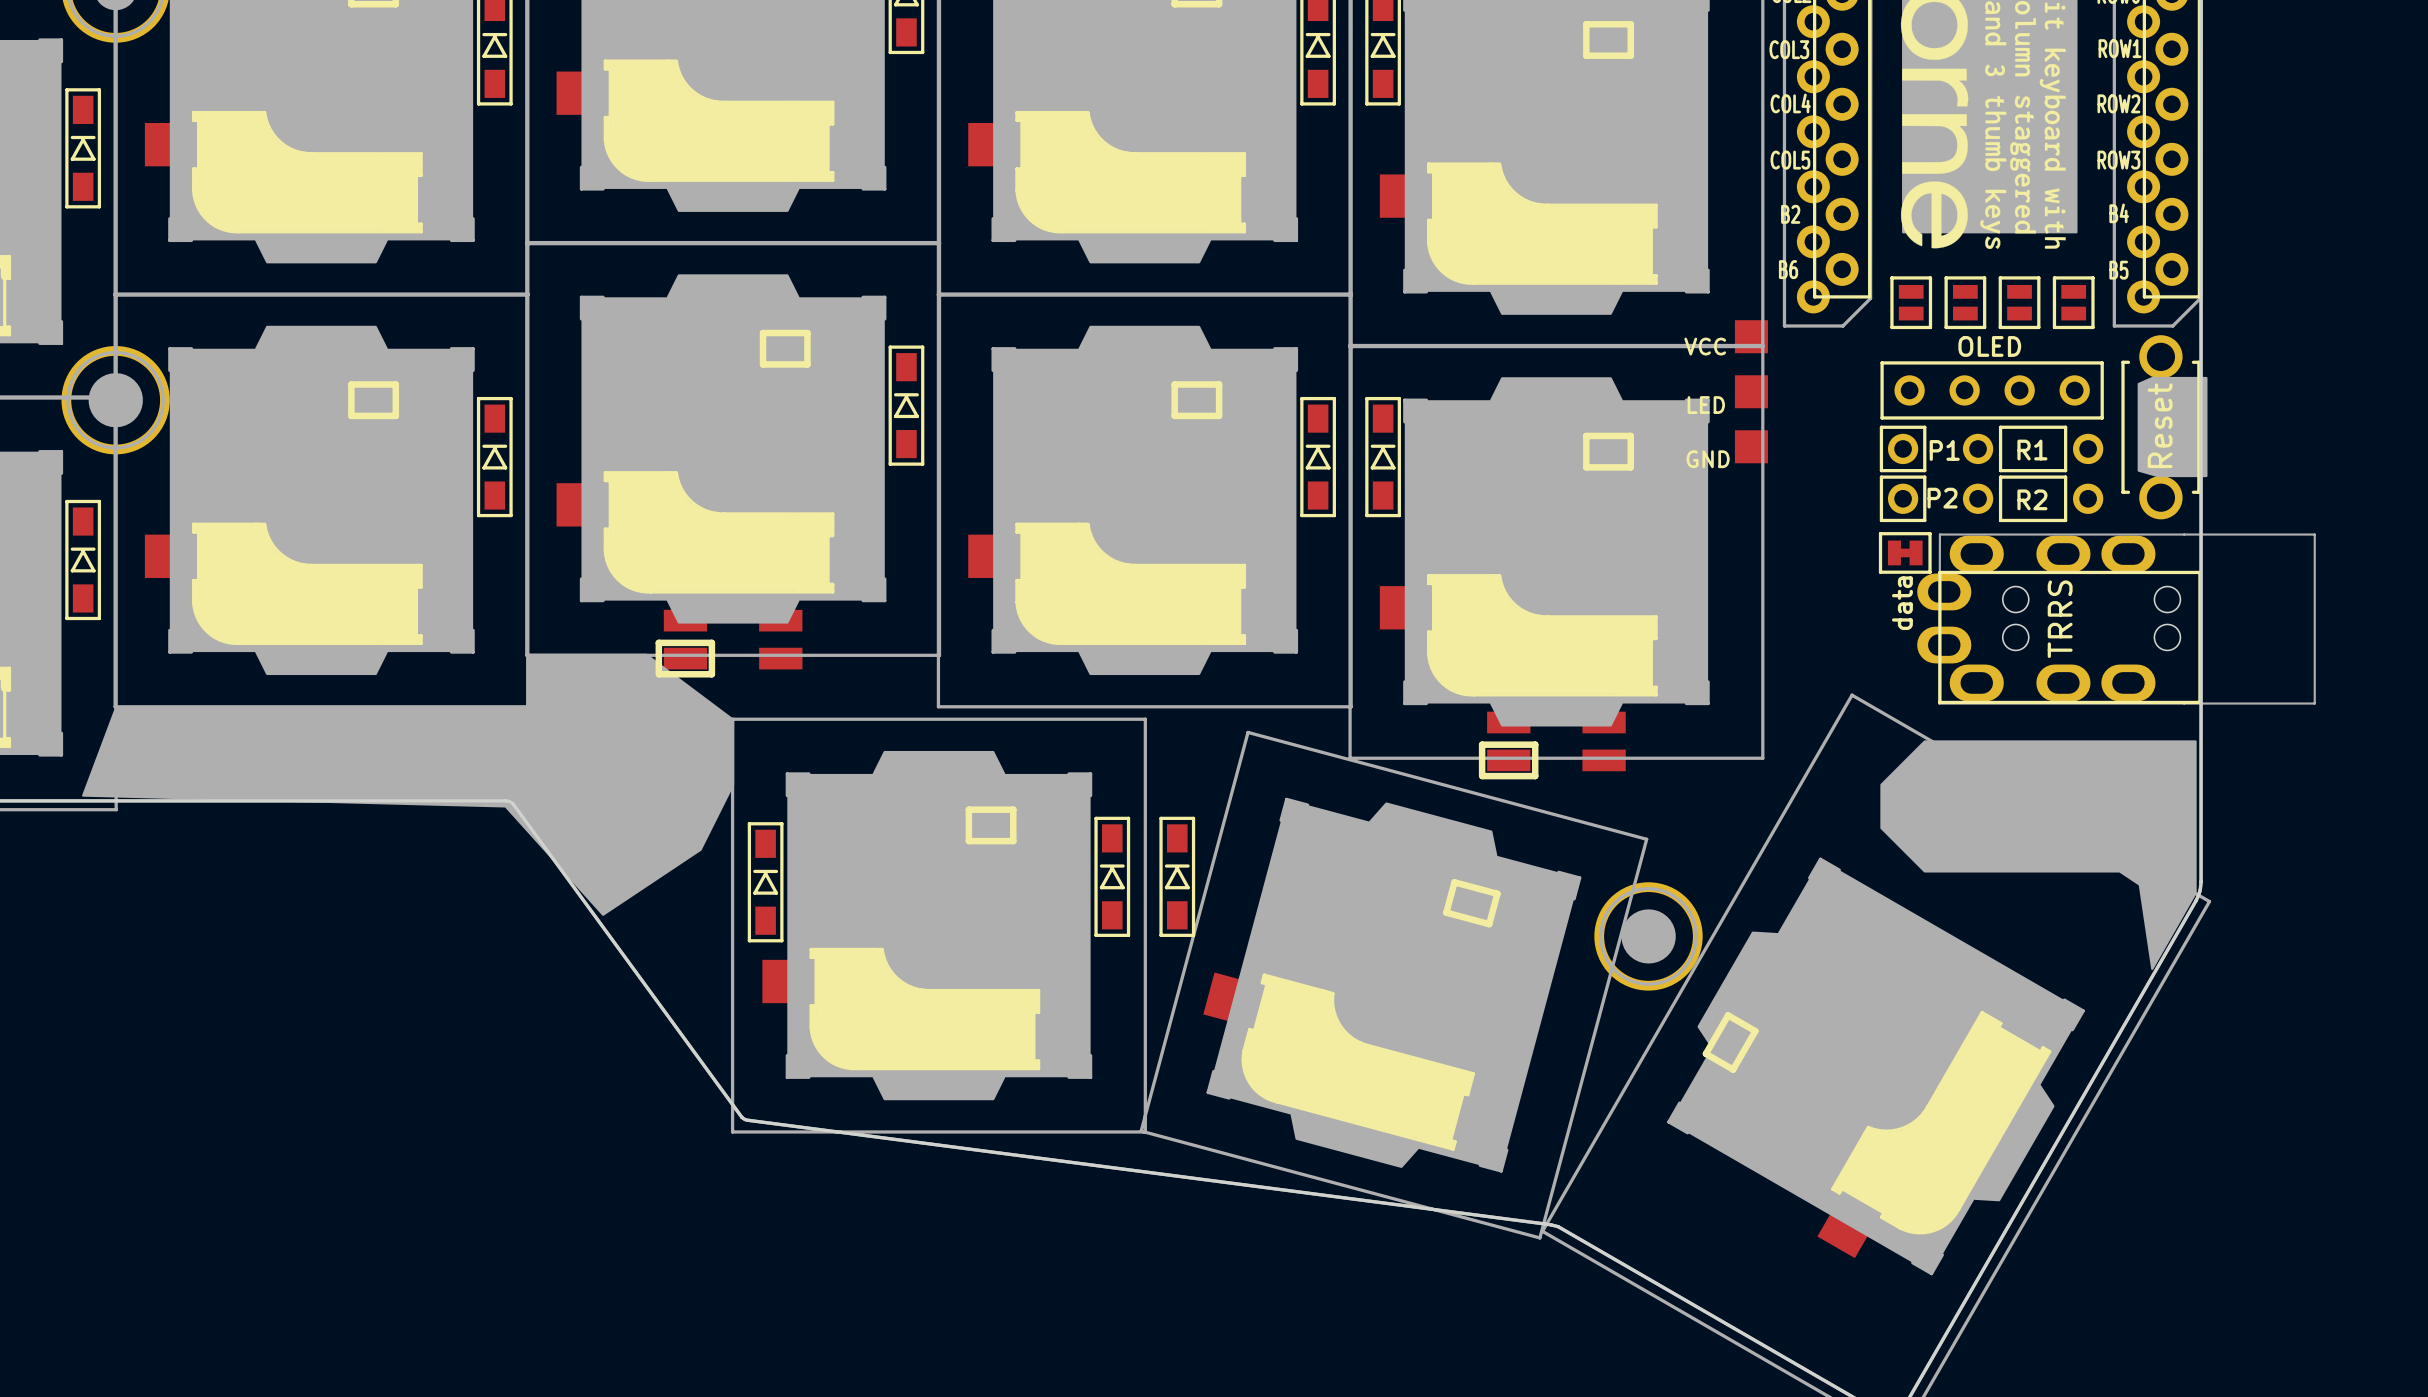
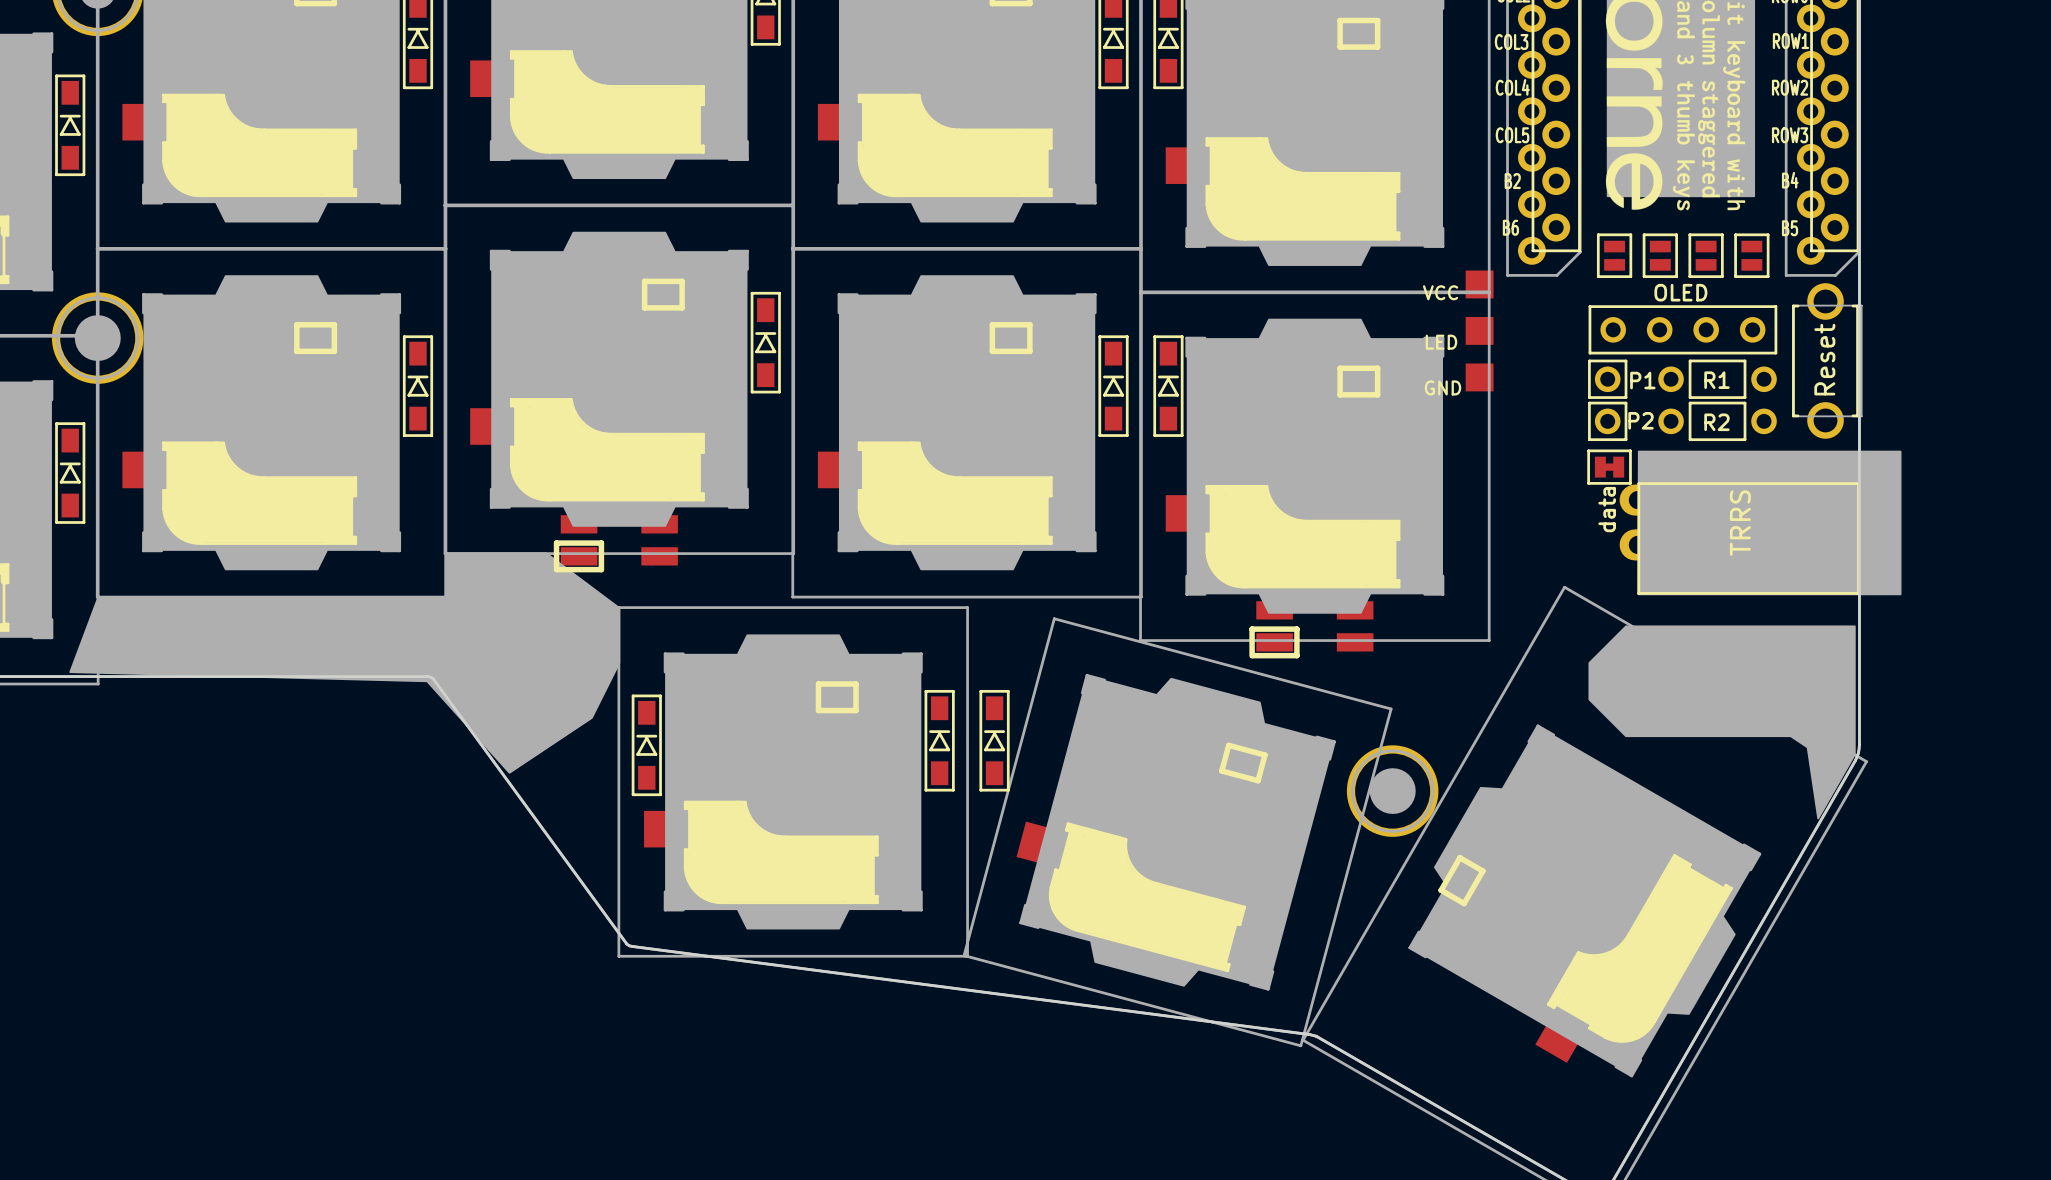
line: none -> (1793, 305) (1861, 305) (1861, 416) (1793, 416) (1793, 305)
drawing: [2137, 376, 2208, 478] -> none
drawing: none -> [1637, 450, 1902, 596]
line: (1939, 534) (1939, 703) (2314, 703) (2314, 534) (1939, 534) -> none

